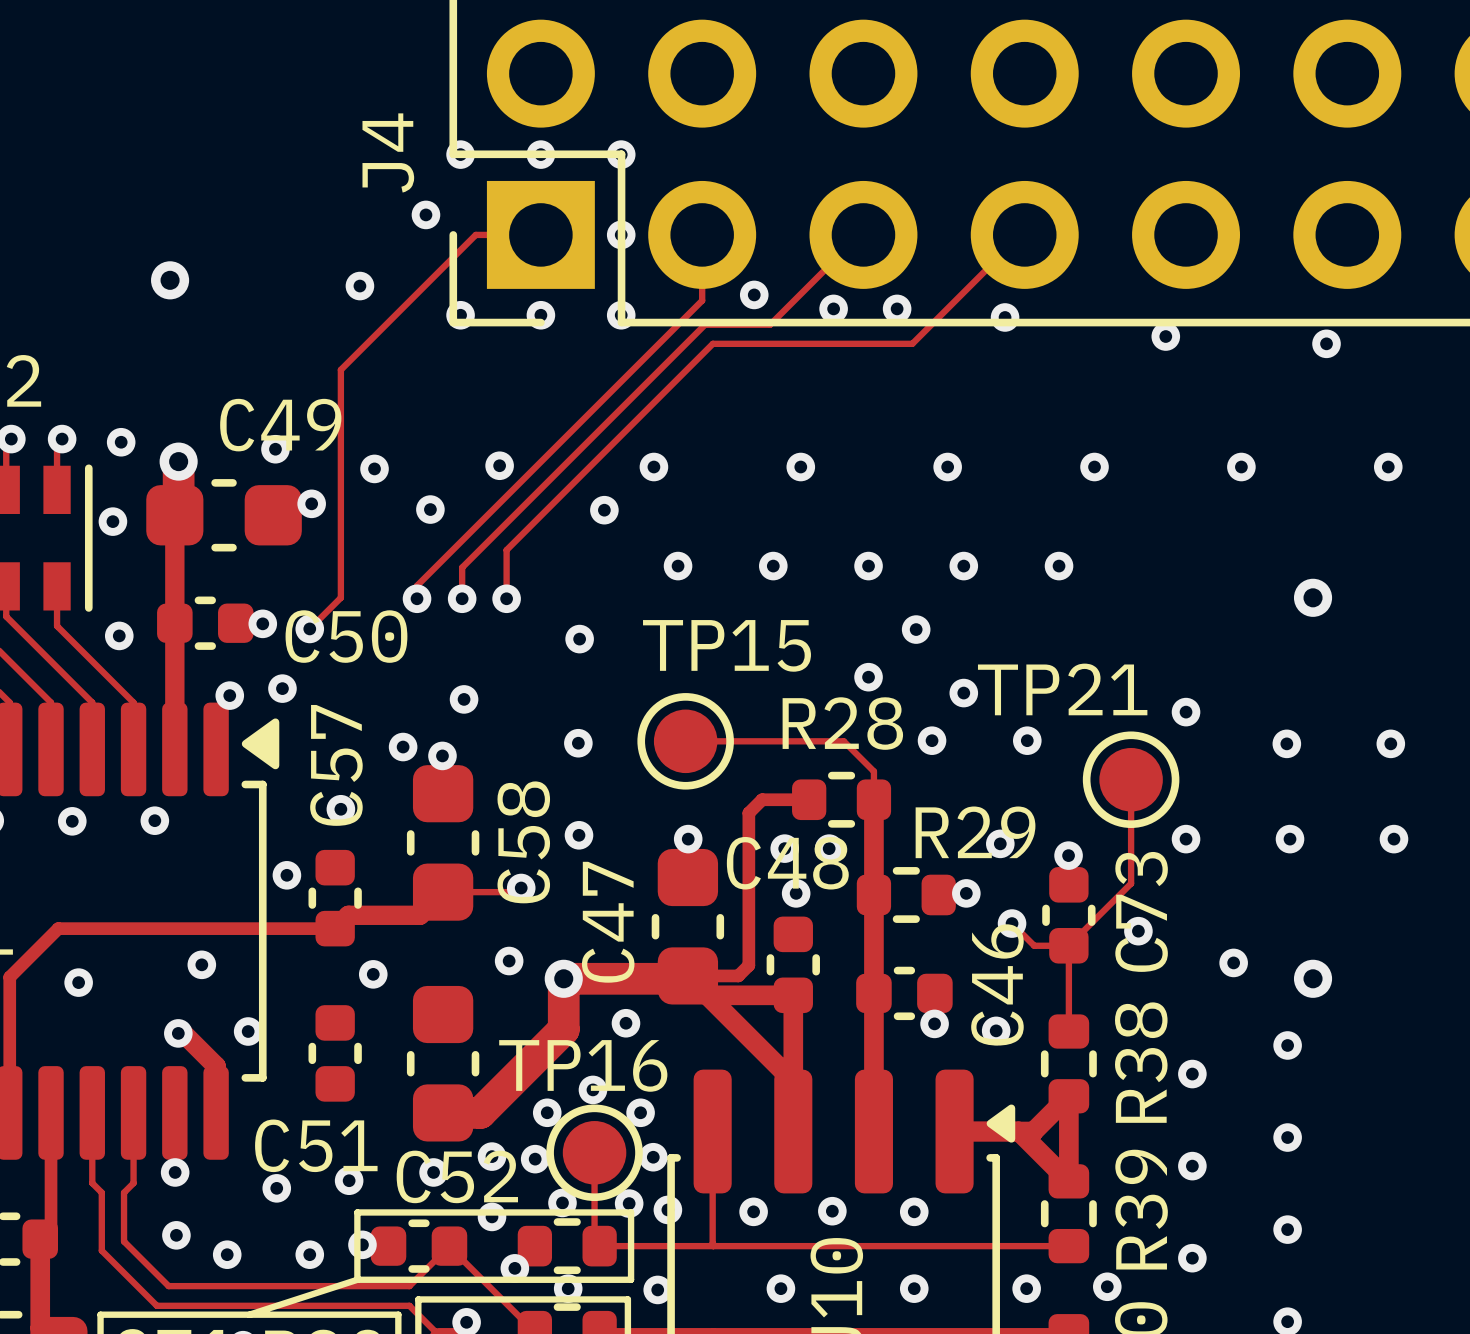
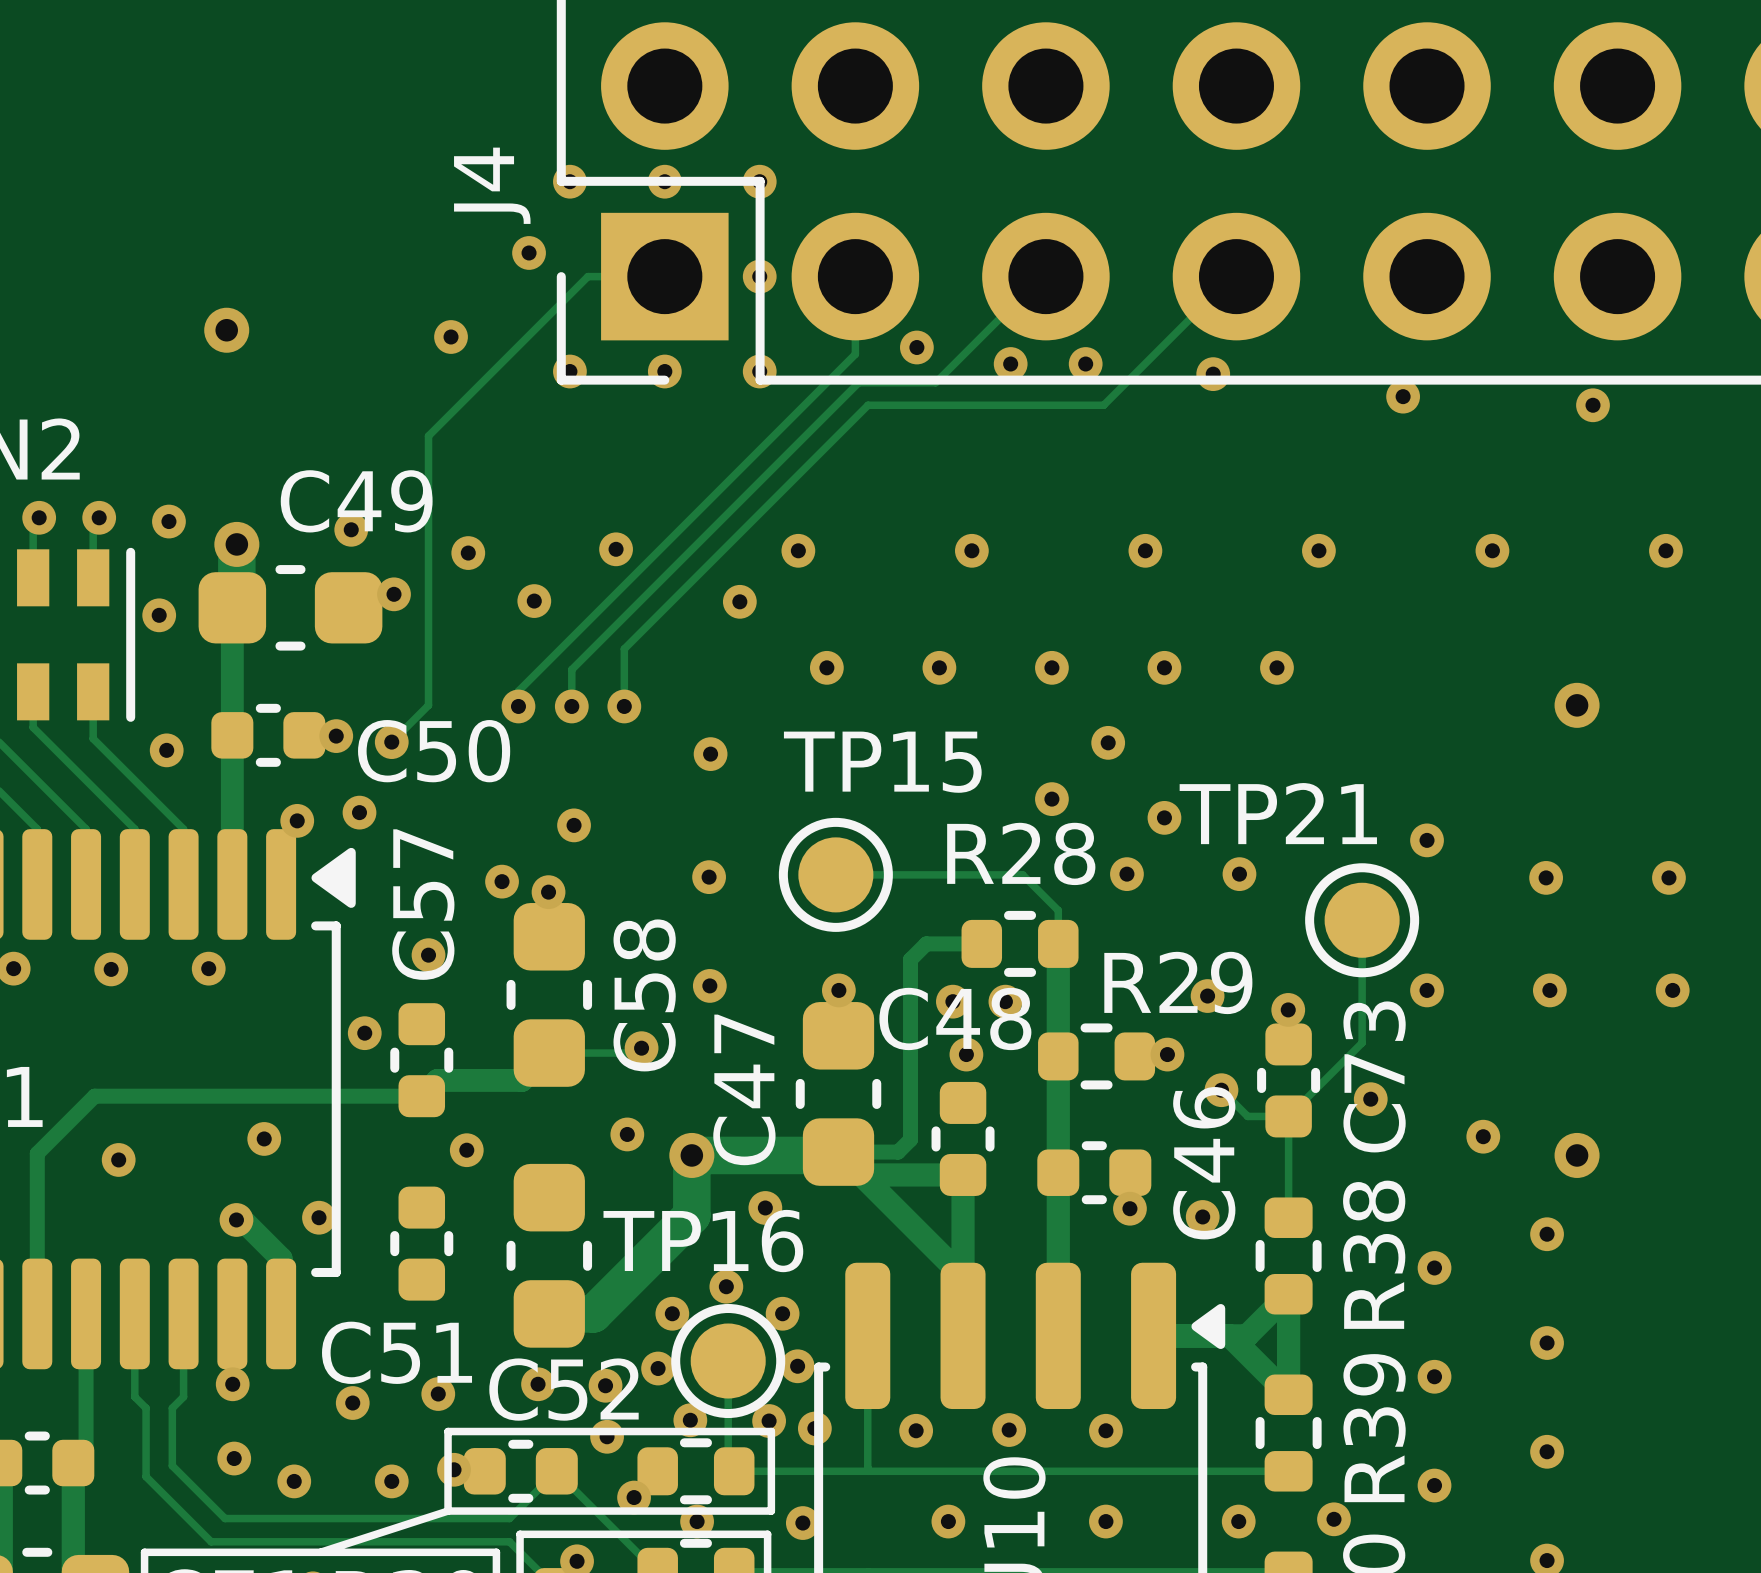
TP16 name position: TP16 (583, 1065) -> TP16 (703, 1241)
via position: (492, 1156) -> (605, 1385)

